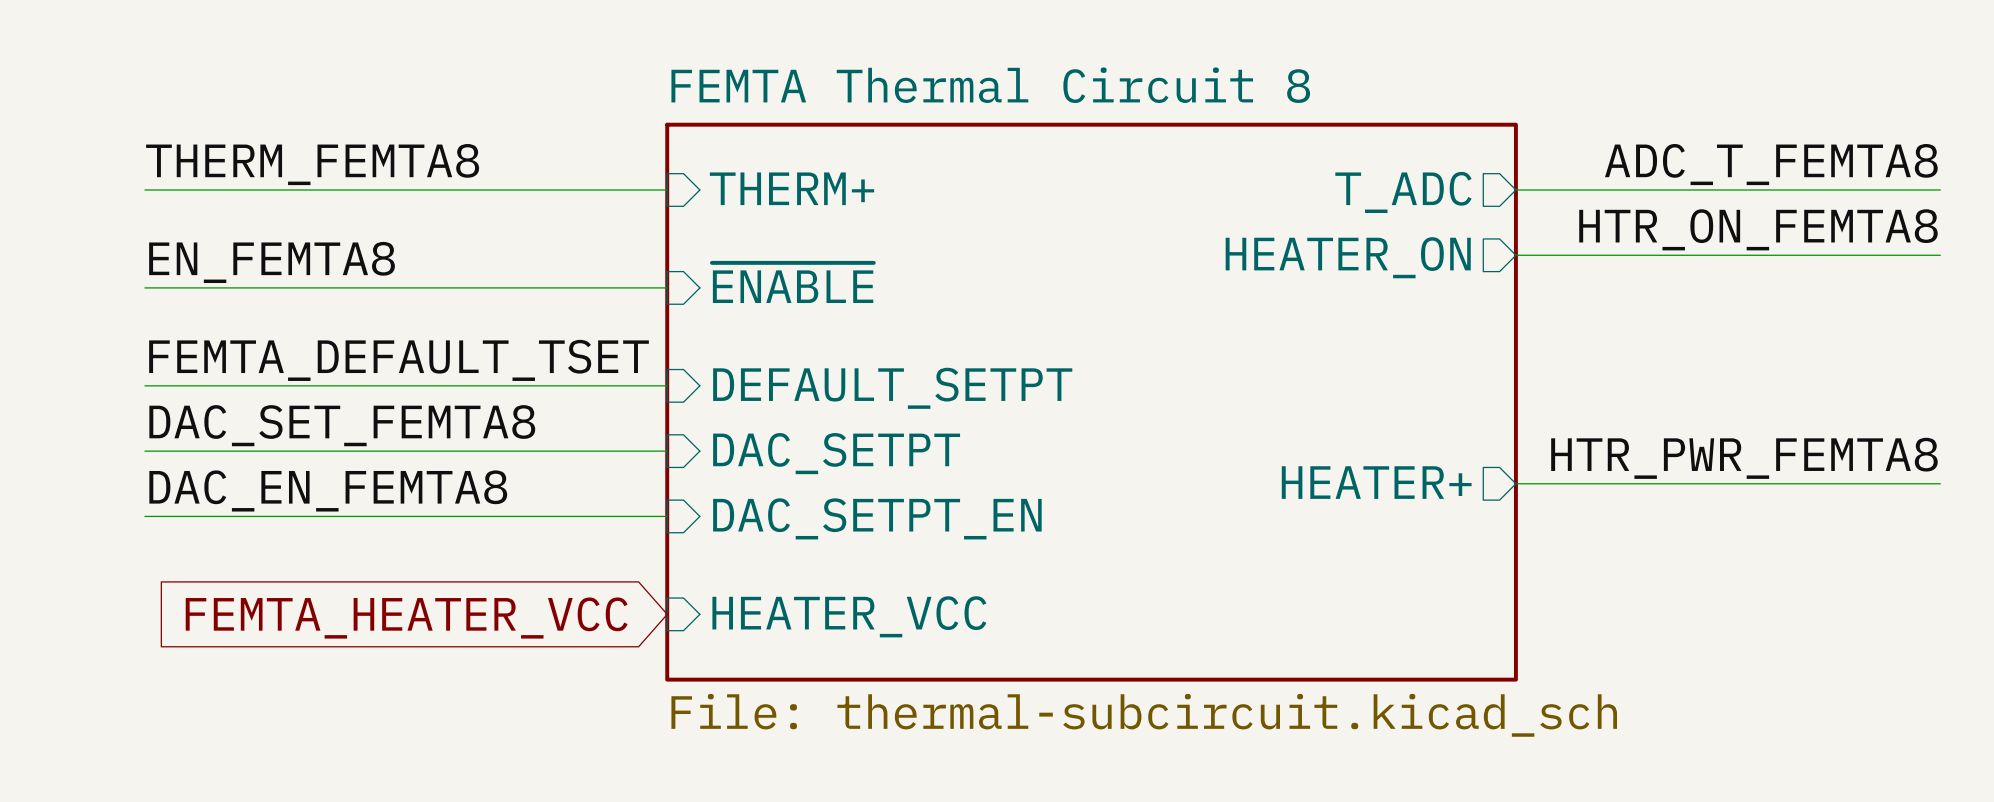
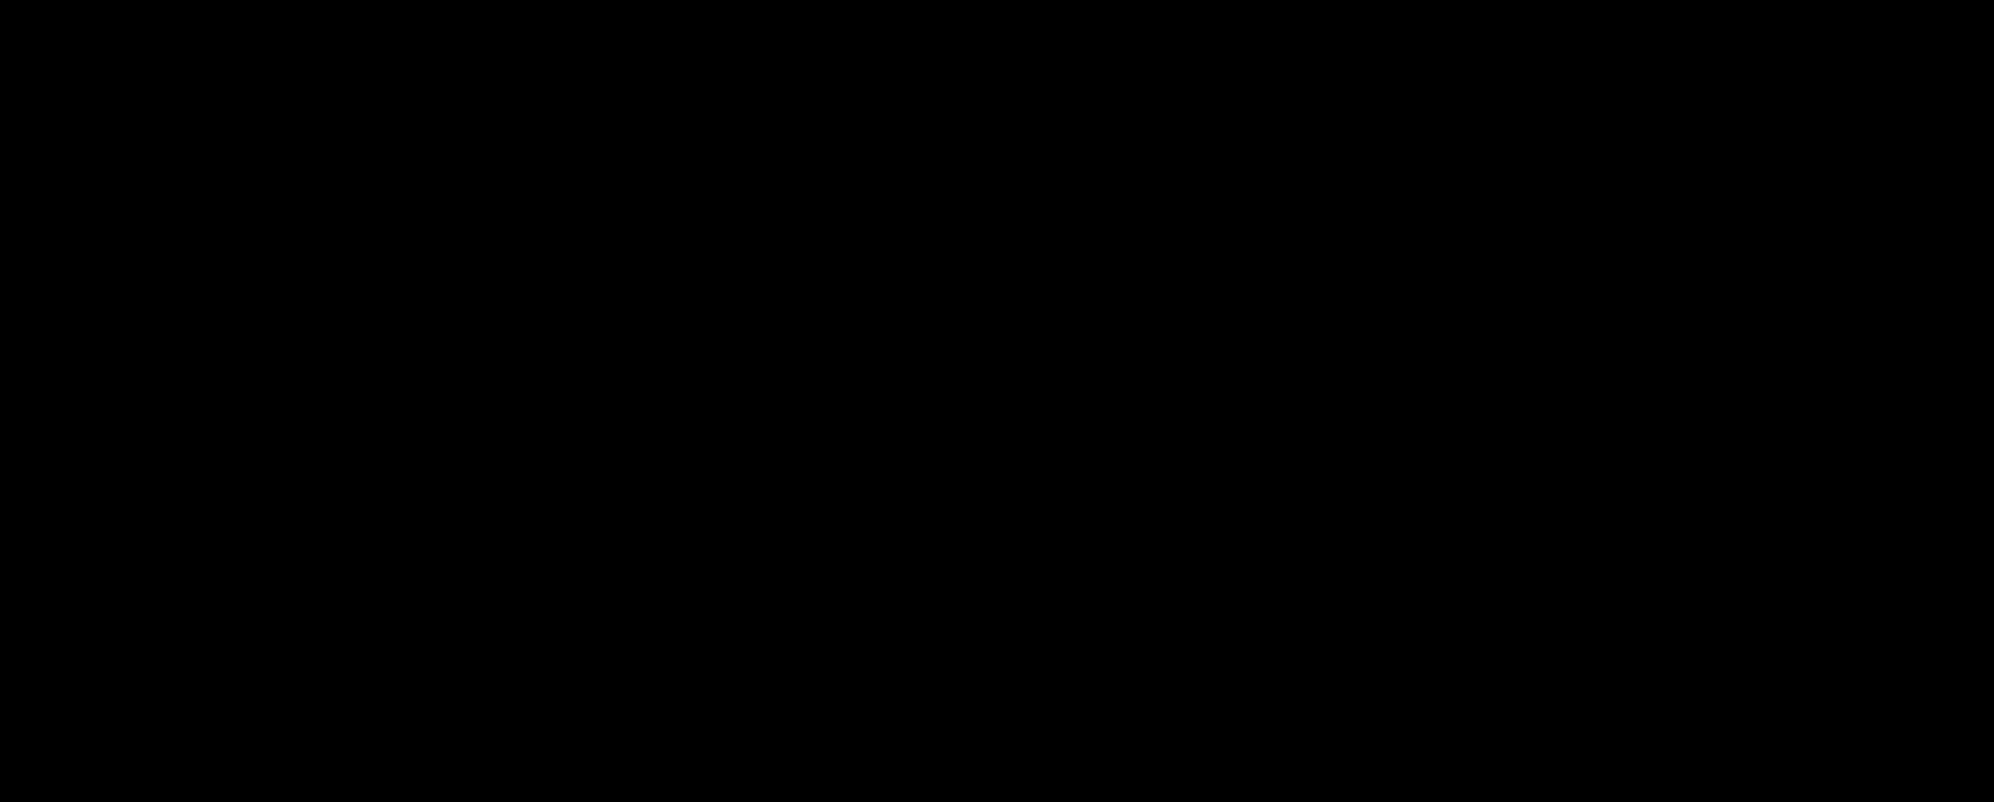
label: THERM_FEMTA8 (312, 164) -> none
label: ADC_T_FEMTA8 (1771, 164) -> none
sheet pin: THERM+ (791, 188) -> none
wire: (144, 189) (667, 189) -> none
wire: (1515, 189) (1940, 189) -> none
sheet pin: T_ADC (1403, 192) -> none
label: HTR_ON_FEMTA8 (1758, 229) -> none
wire: (1515, 255) (1940, 255) -> none
sheet pin: HEATER_ON (1348, 257) -> none
label: EN_FEMTA8 (272, 262) -> none
sheet pin: ~{ENABLE} (792, 282) -> none
wire: (144, 287) (667, 287) -> none
label: FEMTA_DEFAULT_TSET (399, 360) -> none
wire: (144, 385) (667, 385) -> none
sheet pin: DEFAULT_SETPT (892, 388) -> none
sheet FEMTA Thermal Circuit 8: File: thermal-subcircuit.kicad_sch (1091, 402) -> none
label: DAC_SET_FEMTA8 (342, 425) -> none
wire: (144, 451) (667, 451) -> none
sheet pin: DAC_SETPT (836, 453) -> none
label: HTR_PWR_FEMTA8 (1744, 458) -> none
sheet pin: HEATER+ (1376, 482) -> none
wire: (1515, 483) (1940, 483) -> none
label: DAC_EN_FEMTA8 (328, 490) -> none
wire: (144, 516) (667, 516) -> none
sheet pin: DAC_SETPT_EN (877, 518) -> none
sheet pin: HEATER_VCC (849, 616) -> none
global label: FEMTA_HEATER_VCC (406, 618) -> none

